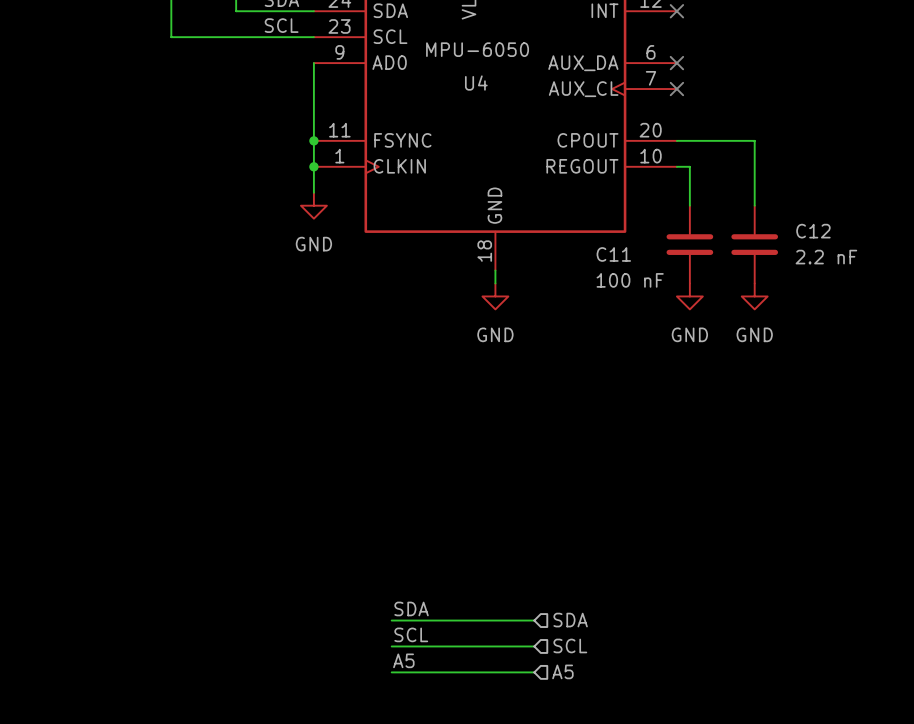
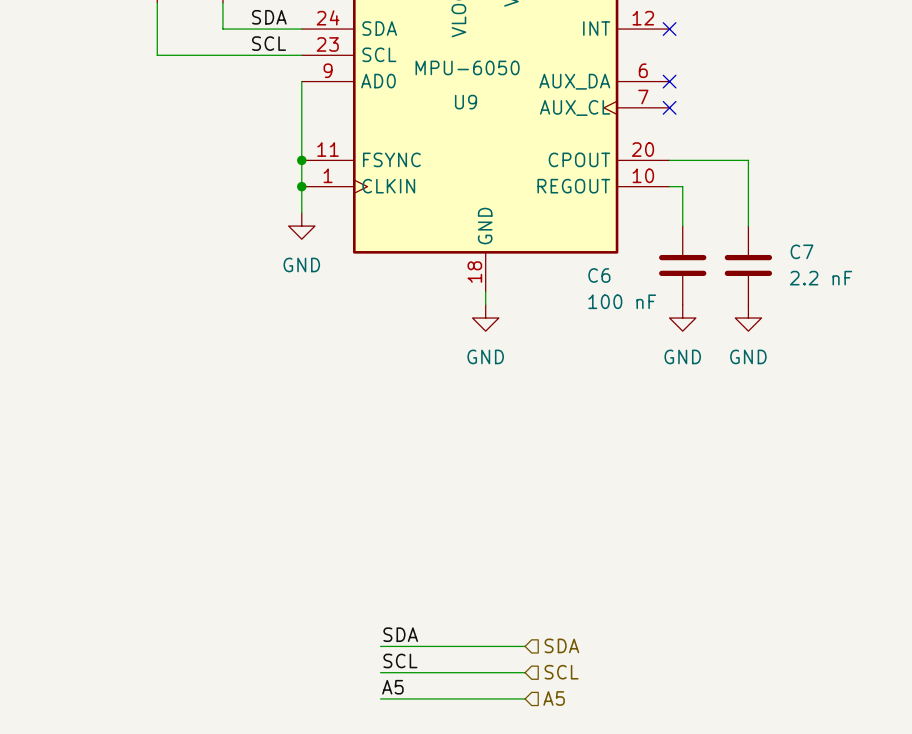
U4 name: U4 (476, 83) -> U9 (466, 102)
C12 name: C12 (813, 231) -> C7 (801, 251)
C11 name: C11 (613, 254) -> C6 (599, 275)

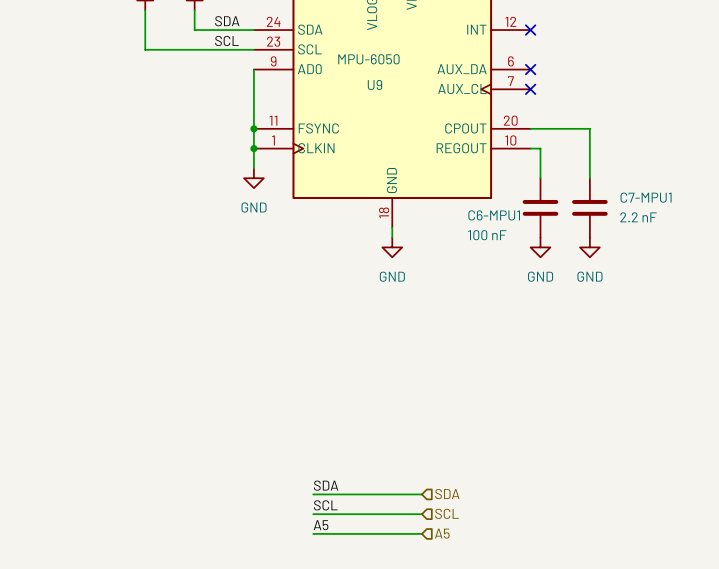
C7 name: C7 (801, 251) -> C7-MPU1 (646, 197)
C6 name: C6 (599, 275) -> C6-MPU1 (494, 215)

